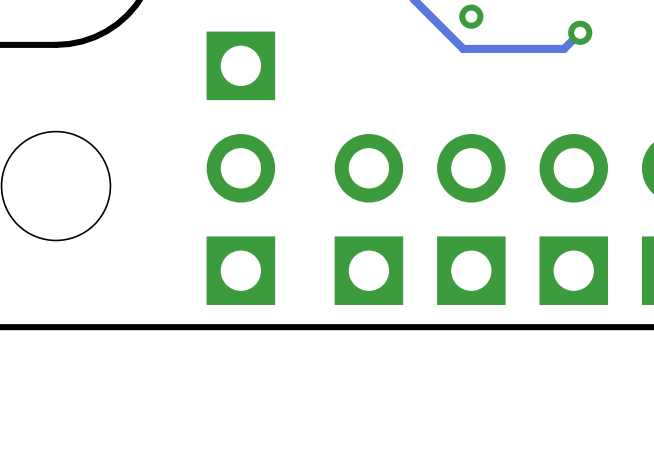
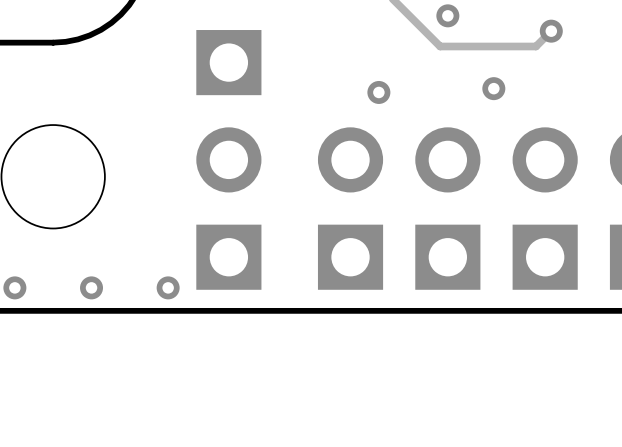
via: none -> (493, 88)
via: none -> (378, 92)
via: none -> (14, 287)
via: none -> (91, 287)
via: none -> (168, 287)

